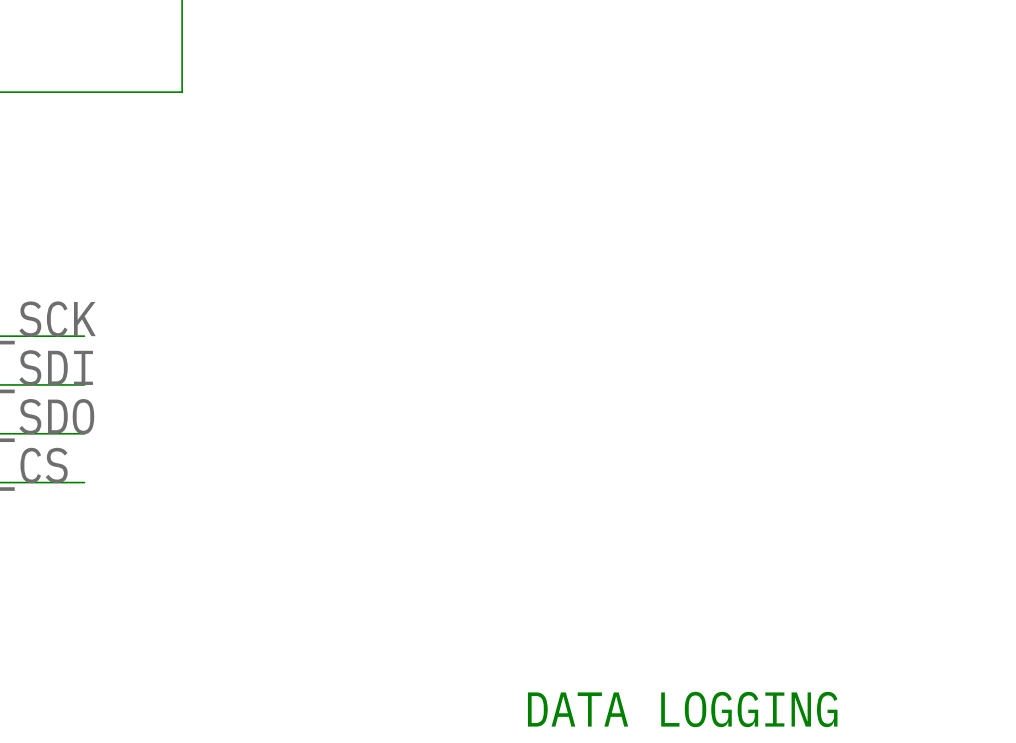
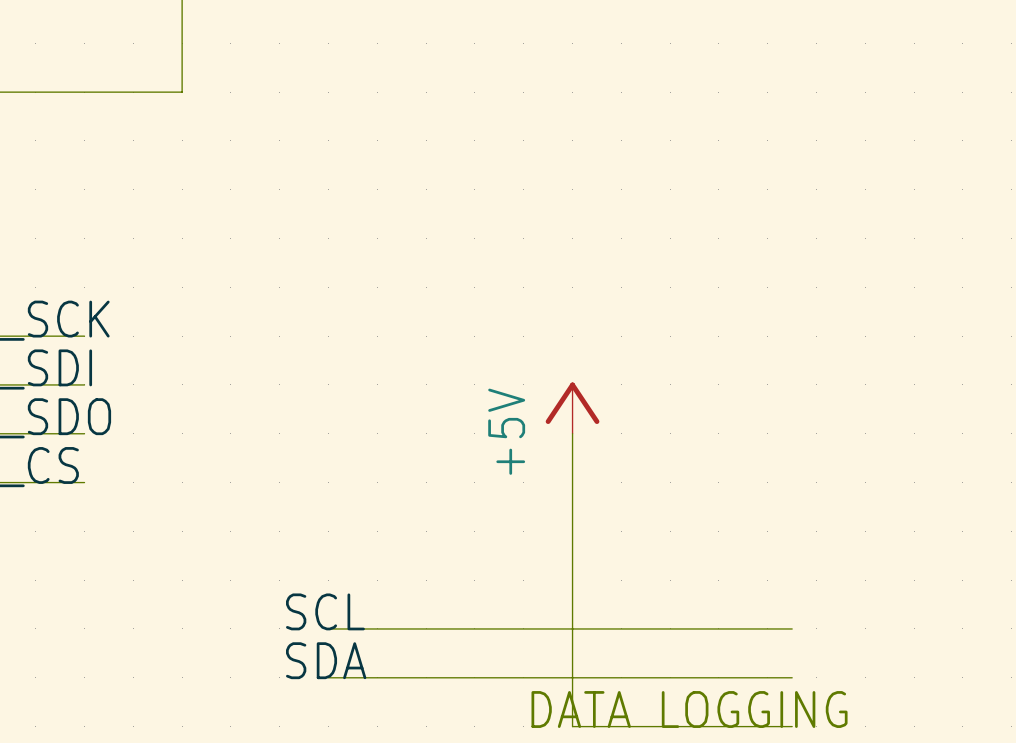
power symbol: none -> +5V (572, 408)
wire: none -> (572, 433) (572, 726) (792, 726)
label: none -> SCL (325, 611)
wire: none -> (328, 628) (792, 628)
label: none -> SDA (326, 660)
wire: none -> (328, 677) (792, 677)

